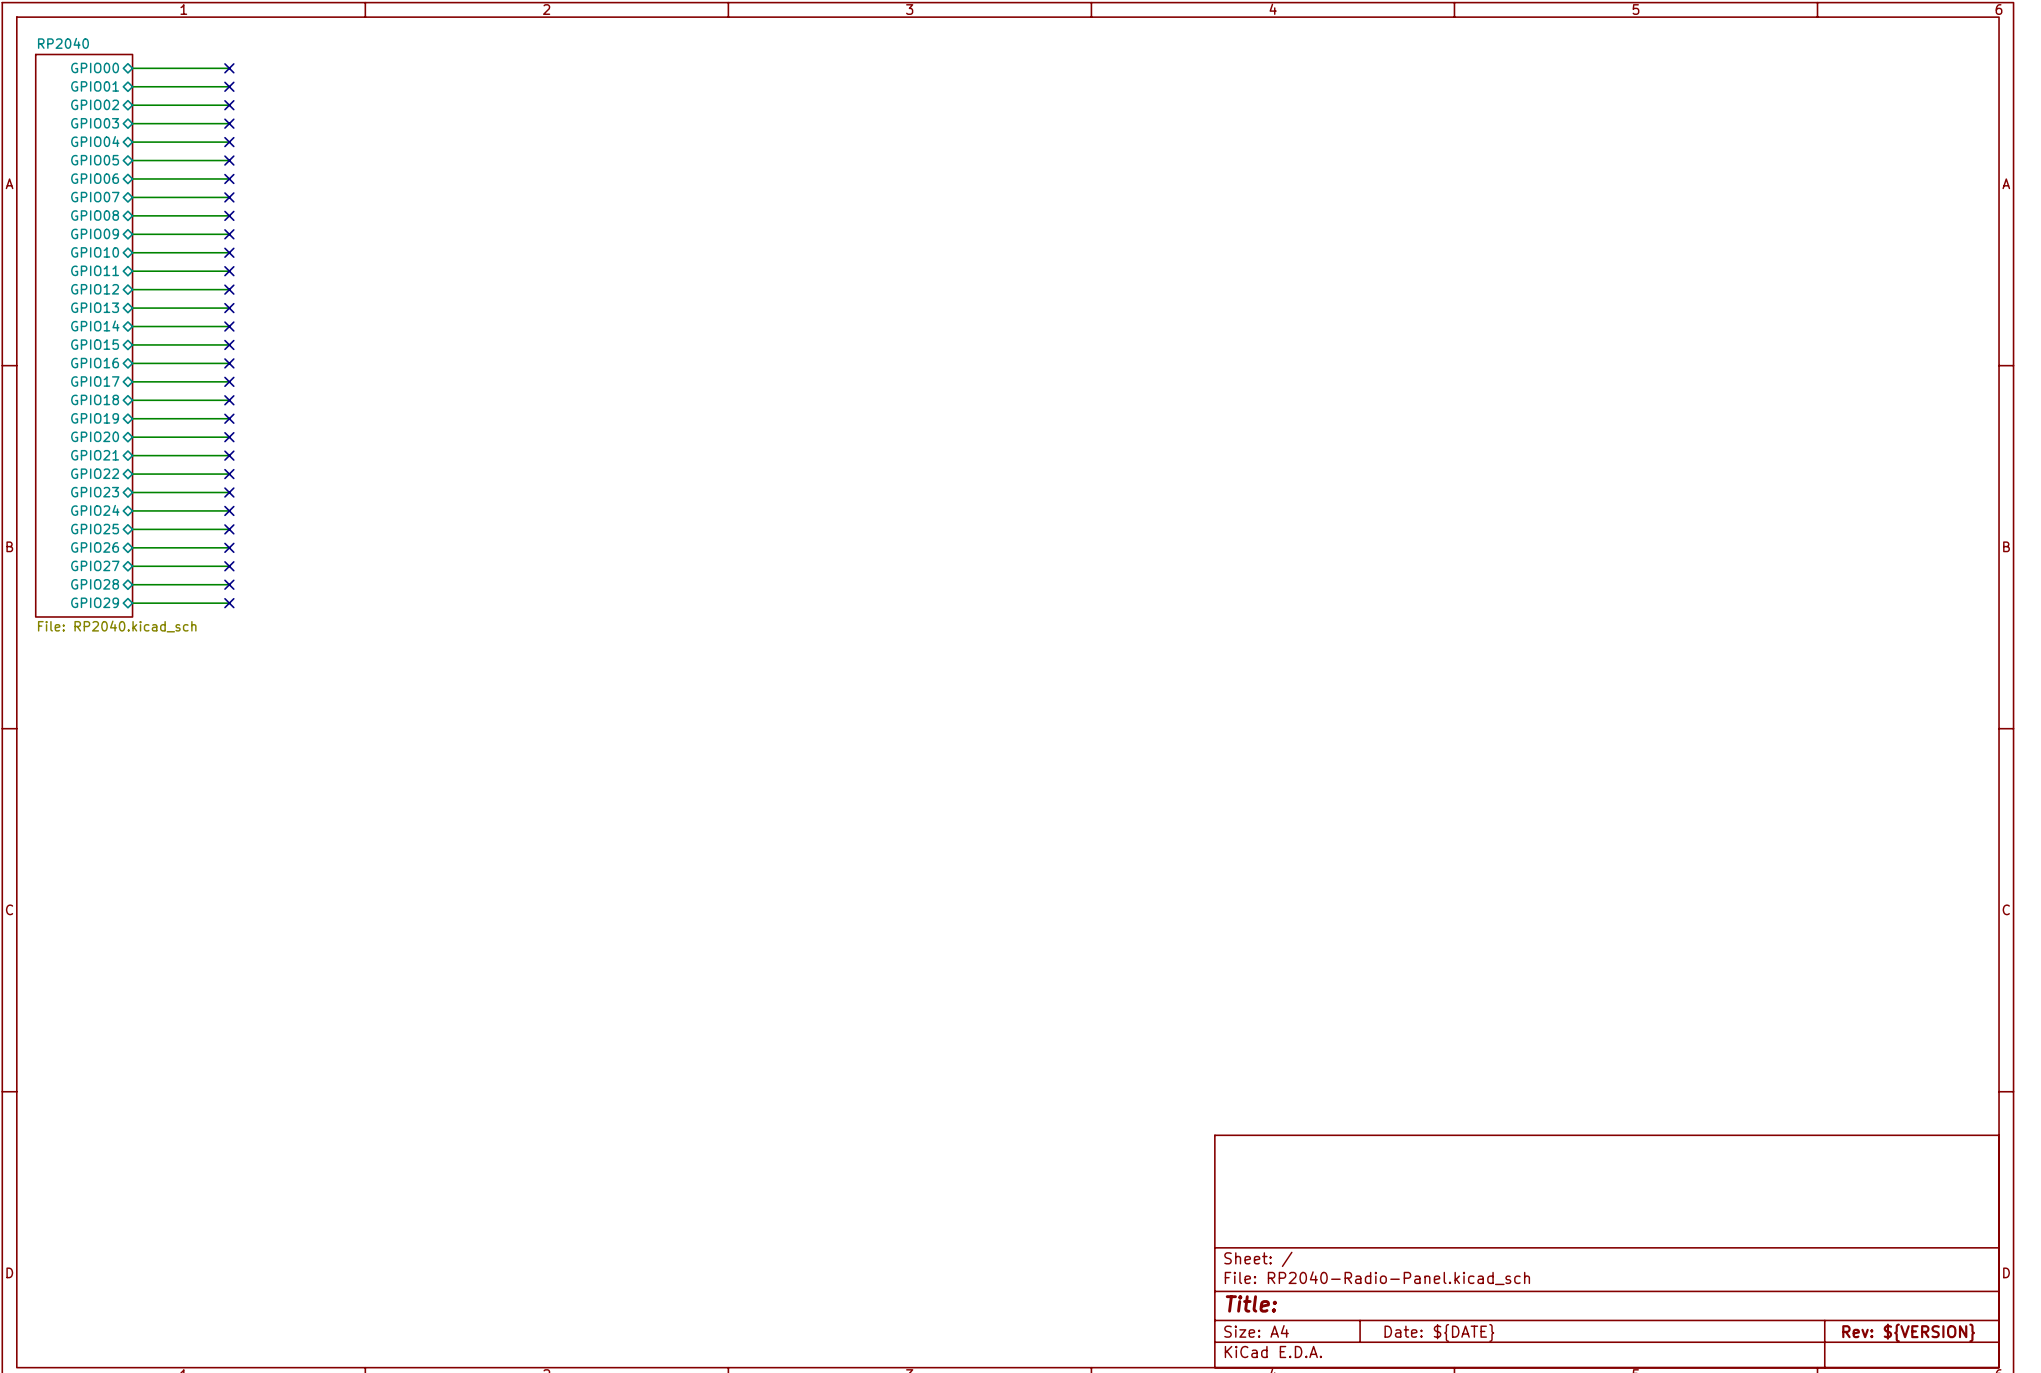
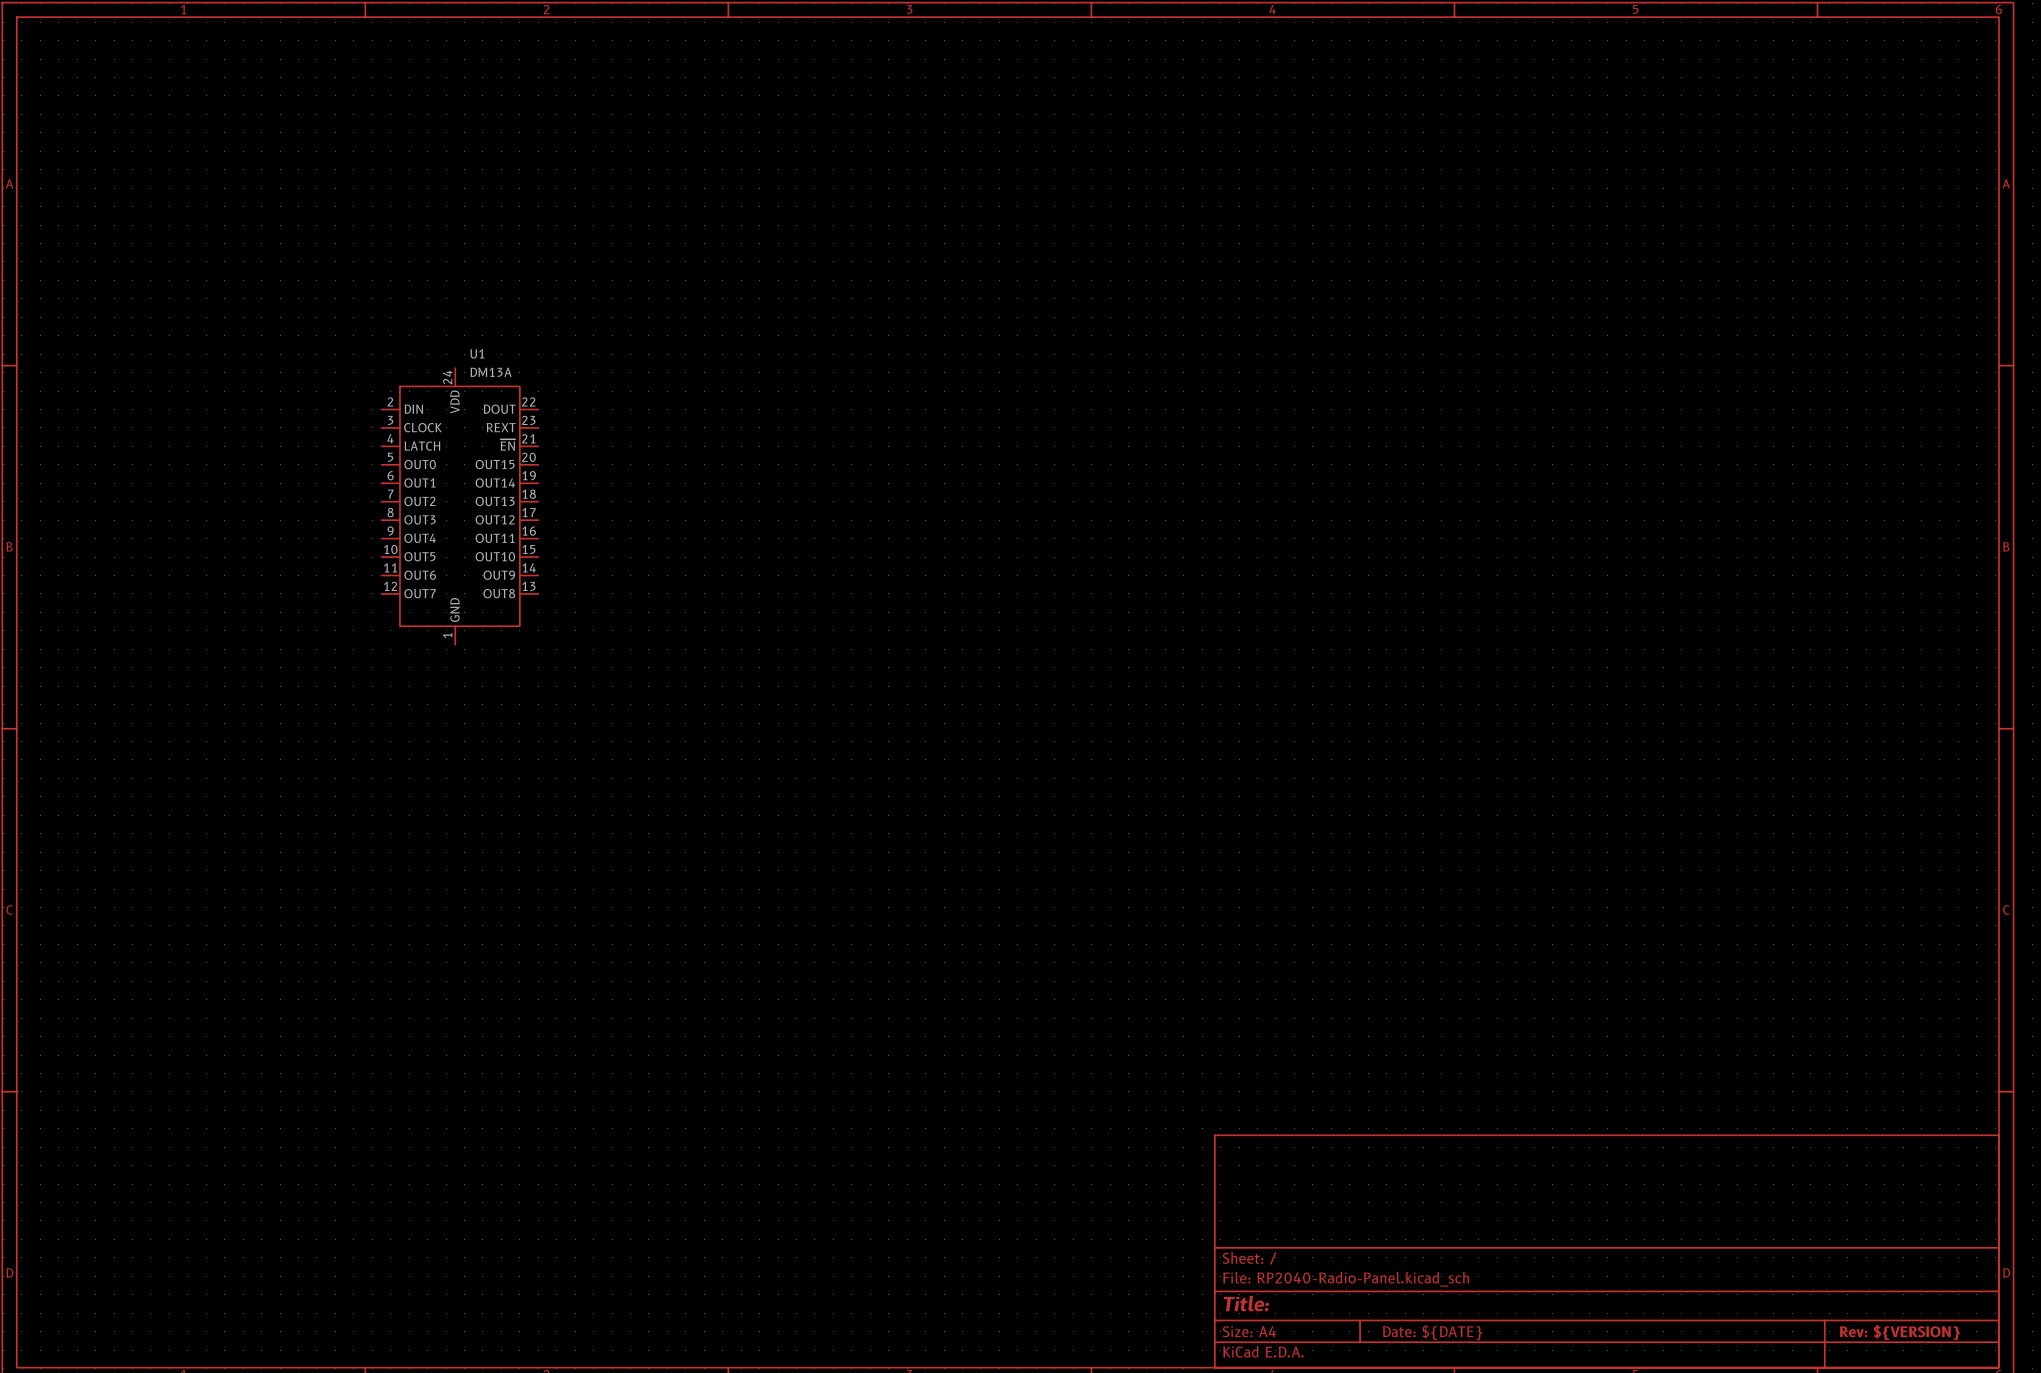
sheet pin: GPIO00 (95, 67) -> none
wire: (132, 68) (229, 68) -> none
no-connect mark: (229, 68) -> none
sheet pin: GPIO01 (95, 86) -> none
wire: (132, 86) (229, 86) -> none
no-connect mark: (229, 86) -> none
sheet pin: GPIO02 (95, 104) -> none
wire: (132, 105) (229, 105) -> none
no-connect mark: (229, 105) -> none
sheet pin: GPIO03 (95, 123) -> none
wire: (132, 123) (229, 123) -> none
no-connect mark: (229, 123) -> none
sheet pin: GPIO04 (95, 141) -> none
wire: (132, 142) (229, 142) -> none
no-connect mark: (229, 142) -> none
sheet pin: GPIO05 (95, 160) -> none
wire: (132, 160) (229, 160) -> none
no-connect mark: (229, 160) -> none
sheet pin: GPIO06 (95, 178) -> none
wire: (132, 178) (229, 178) -> none
no-connect mark: (229, 178) -> none
sheet pin: GPIO07 (95, 197) -> none
wire: (132, 197) (229, 197) -> none
no-connect mark: (229, 197) -> none
sheet pin: GPIO08 (95, 215) -> none
wire: (132, 215) (229, 215) -> none
no-connect mark: (229, 215) -> none
sheet pin: GPIO09 (95, 233) -> none
wire: (132, 234) (229, 234) -> none
no-connect mark: (229, 234) -> none
sheet pin: GPIO10 (95, 252) -> none
wire: (132, 252) (229, 252) -> none
no-connect mark: (229, 252) -> none
sheet pin: GPIO11 (95, 270) -> none
wire: (132, 271) (229, 271) -> none
no-connect mark: (229, 271) -> none
sheet pin: GPIO12 (95, 289) -> none
wire: (132, 289) (229, 289) -> none
no-connect mark: (229, 289) -> none
sheet pin: GPIO13 (95, 307) -> none
wire: (132, 308) (229, 308) -> none
no-connect mark: (229, 308) -> none
sheet pin: GPIO14 (95, 325) -> none
wire: (132, 326) (229, 326) -> none
no-connect mark: (229, 326) -> none
sheet RP2040: File: RP2040.kicad_sch (84, 335) -> none
sheet pin: GPIO15 (95, 344) -> none
wire: (132, 344) (229, 344) -> none
no-connect mark: (229, 344) -> none
sheet pin: GPIO16 (95, 363) -> none
wire: (132, 363) (229, 363) -> none
no-connect mark: (229, 363) -> none
sheet pin: GPIO17 (95, 381) -> none
wire: (132, 381) (229, 381) -> none
no-connect mark: (229, 381) -> none
sheet pin: GPIO18 (95, 399) -> none
wire: (132, 400) (229, 400) -> none
no-connect mark: (229, 400) -> none
sheet pin: GPIO19 (95, 418) -> none
wire: (132, 418) (229, 418) -> none
no-connect mark: (229, 418) -> none
sheet pin: GPIO20 (95, 436) -> none
wire: (132, 437) (229, 437) -> none
no-connect mark: (229, 437) -> none
sheet pin: GPIO21 (95, 455) -> none
wire: (132, 455) (229, 455) -> none
no-connect mark: (229, 455) -> none
sheet pin: GPIO22 (95, 473) -> none
wire: (132, 474) (229, 474) -> none
no-connect mark: (229, 474) -> none
sheet pin: GPIO23 (95, 492) -> none
wire: (132, 492) (229, 492) -> none
no-connect mark: (229, 492) -> none
U1: none -> DM13A (459, 506)
sheet pin: GPIO24 (95, 510) -> none
wire: (132, 510) (229, 510) -> none
no-connect mark: (229, 510) -> none
sheet pin: GPIO25 (95, 529) -> none
wire: (132, 529) (229, 529) -> none
no-connect mark: (229, 529) -> none
sheet pin: GPIO26 (95, 547) -> none
wire: (132, 547) (229, 547) -> none
no-connect mark: (229, 547) -> none
sheet pin: GPIO27 (95, 565) -> none
wire: (132, 566) (229, 566) -> none
no-connect mark: (229, 566) -> none
sheet pin: GPIO28 (95, 584) -> none
wire: (132, 584) (229, 584) -> none
no-connect mark: (229, 584) -> none
sheet pin: GPIO29 (95, 602) -> none
wire: (132, 603) (229, 603) -> none
no-connect mark: (229, 603) -> none

